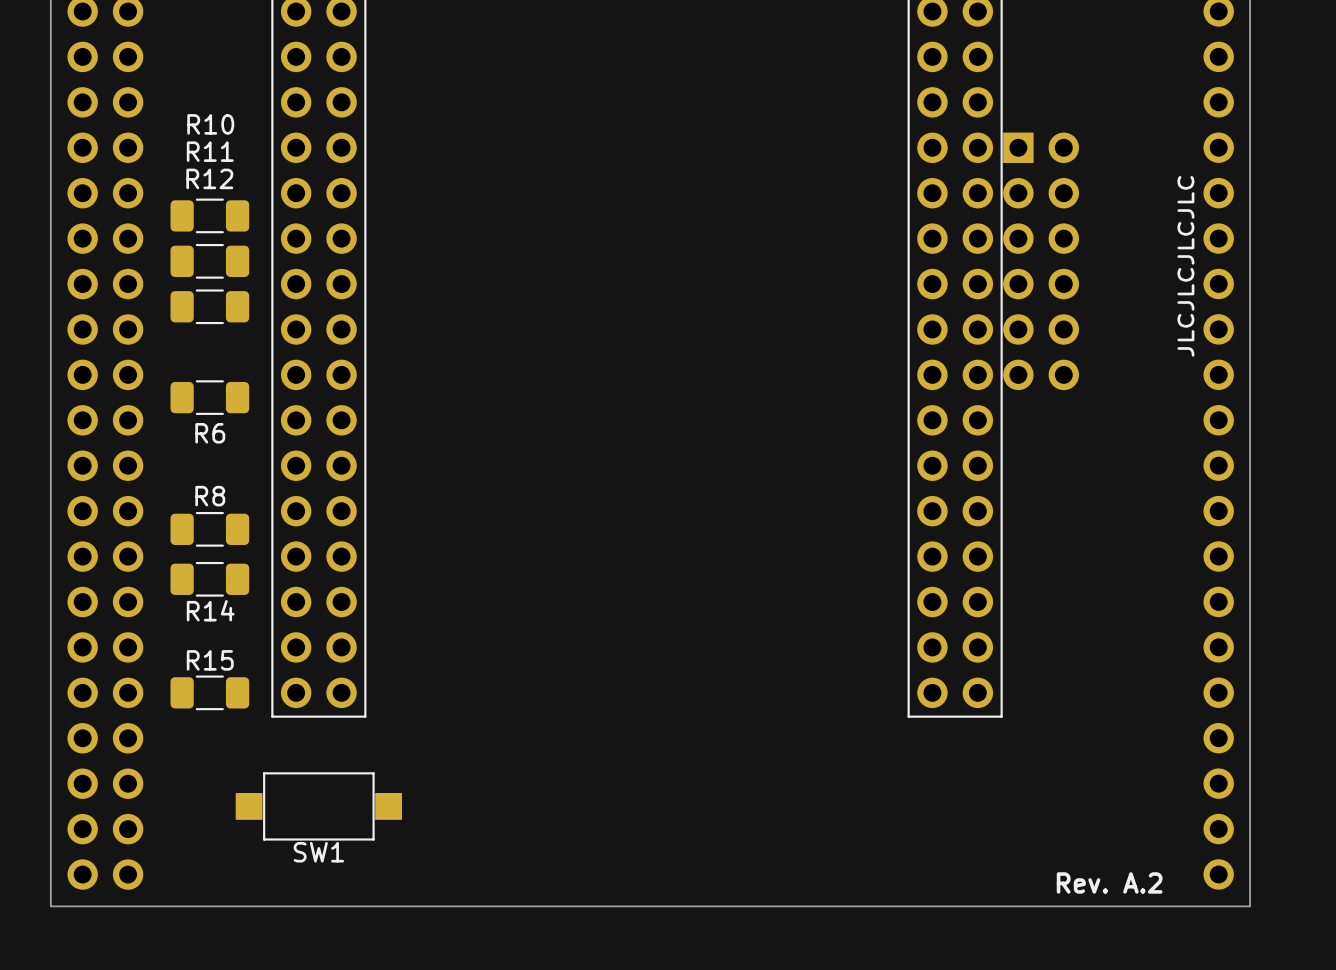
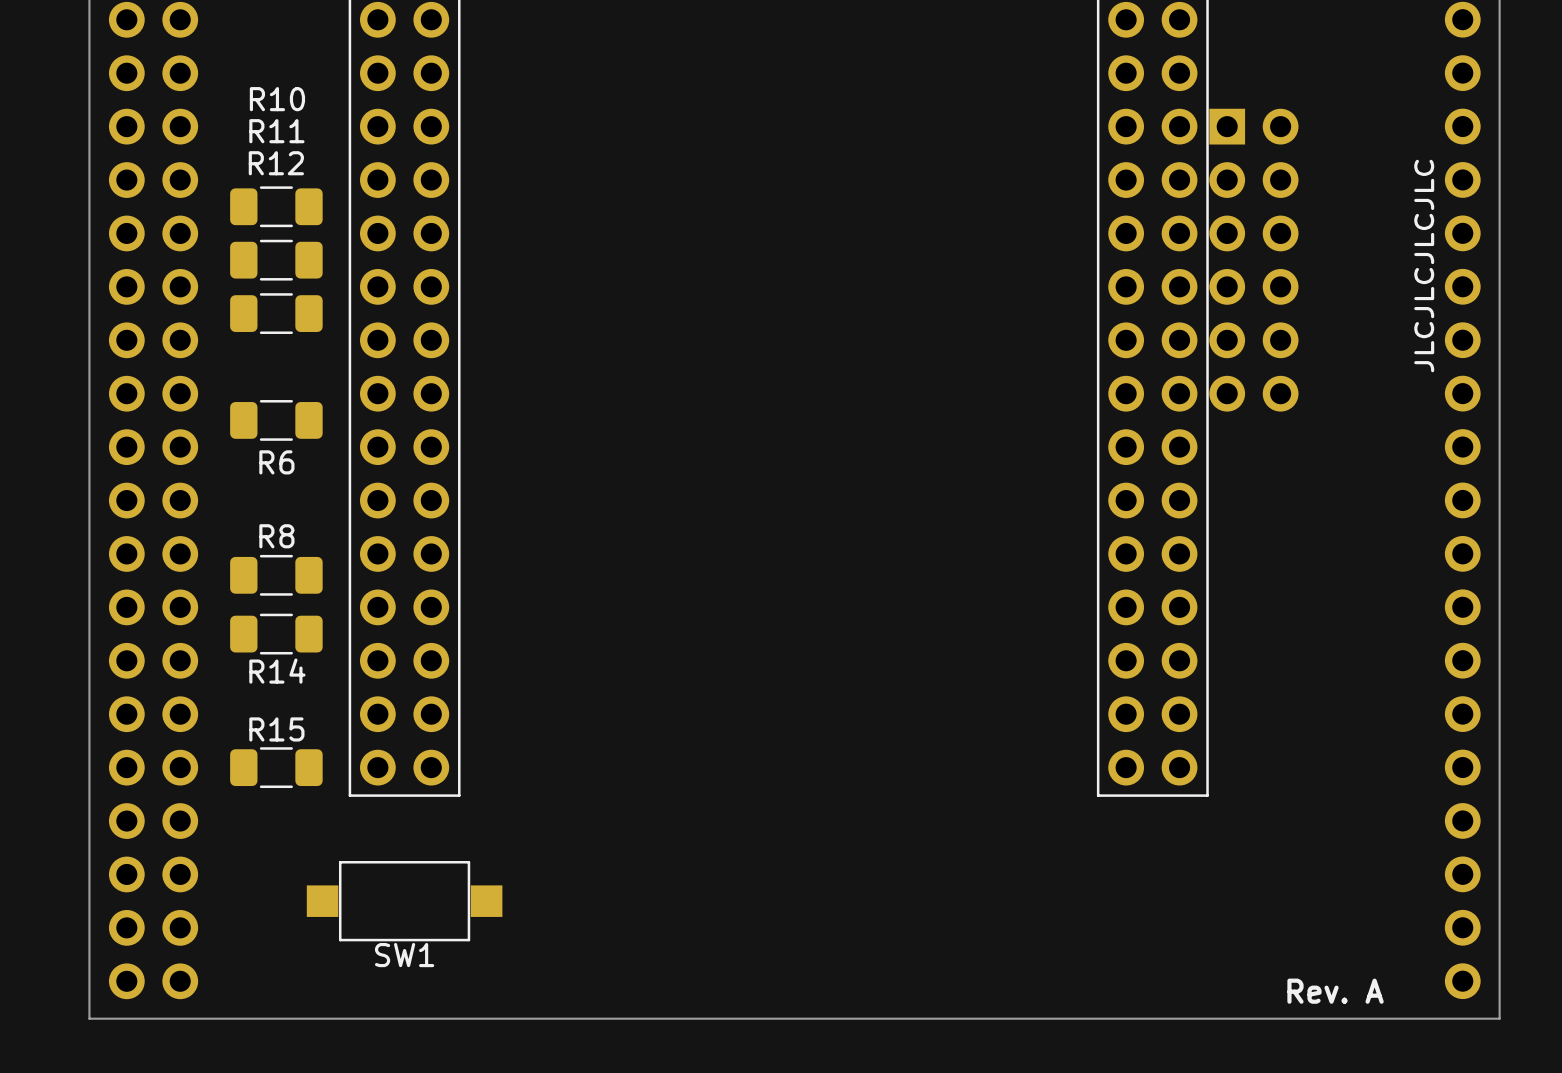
text: Rev. A.2 (1109, 882) -> Rev. A (1335, 991)

